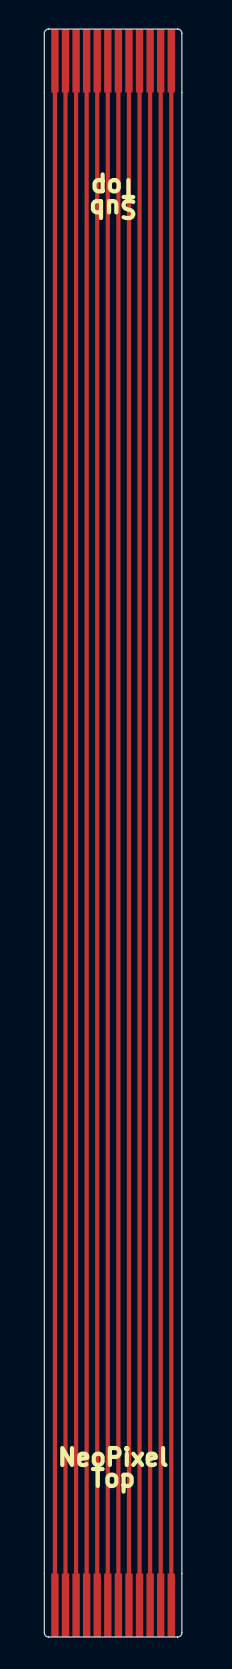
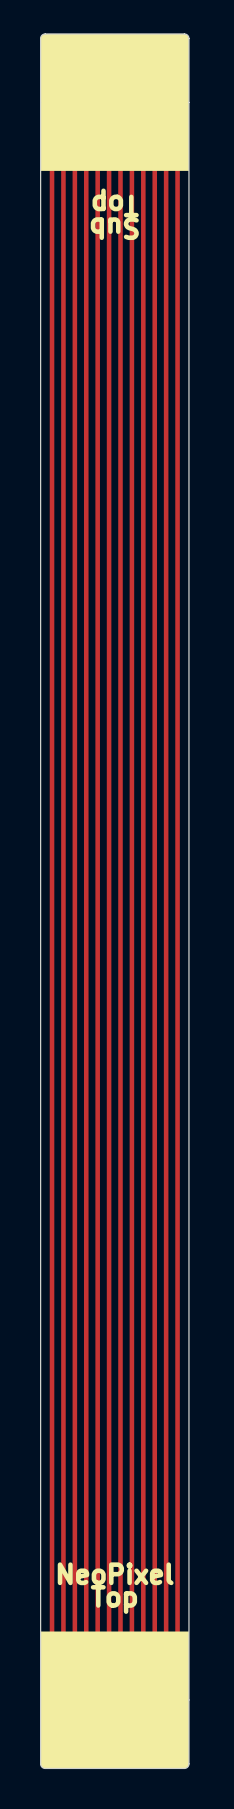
drawing: none -> [40, 33, 189, 171]
drawing: none -> [40, 1631, 189, 1769]

